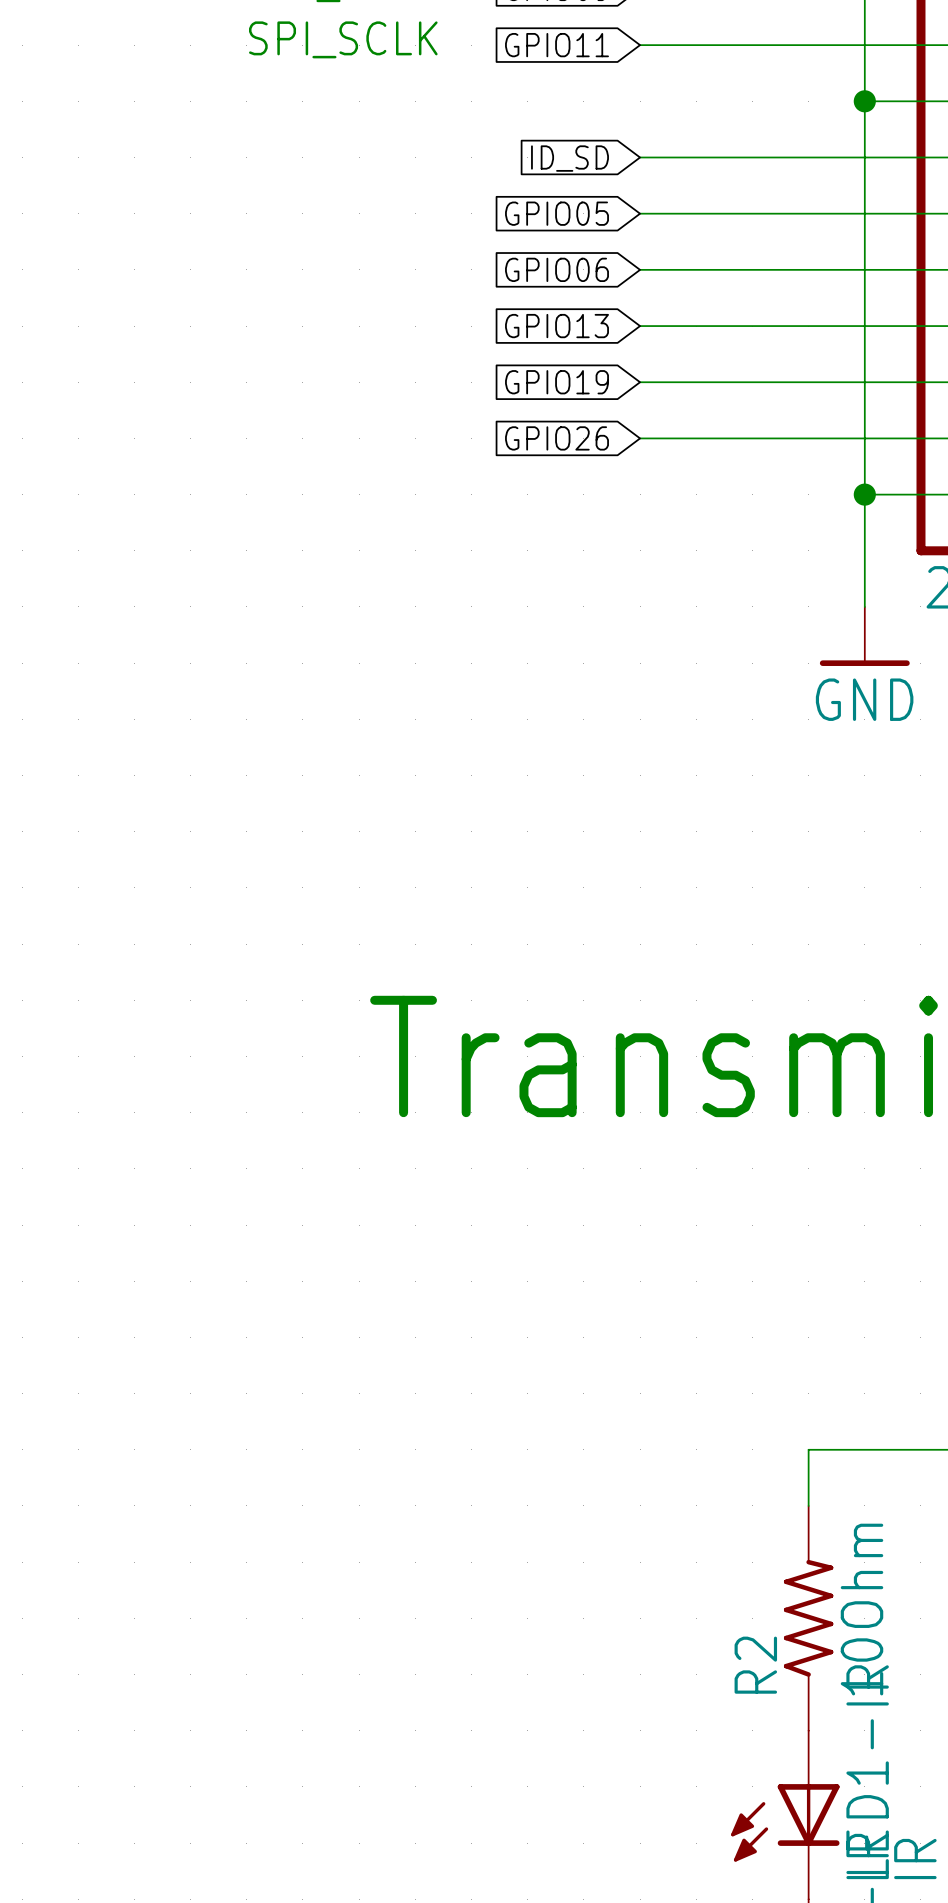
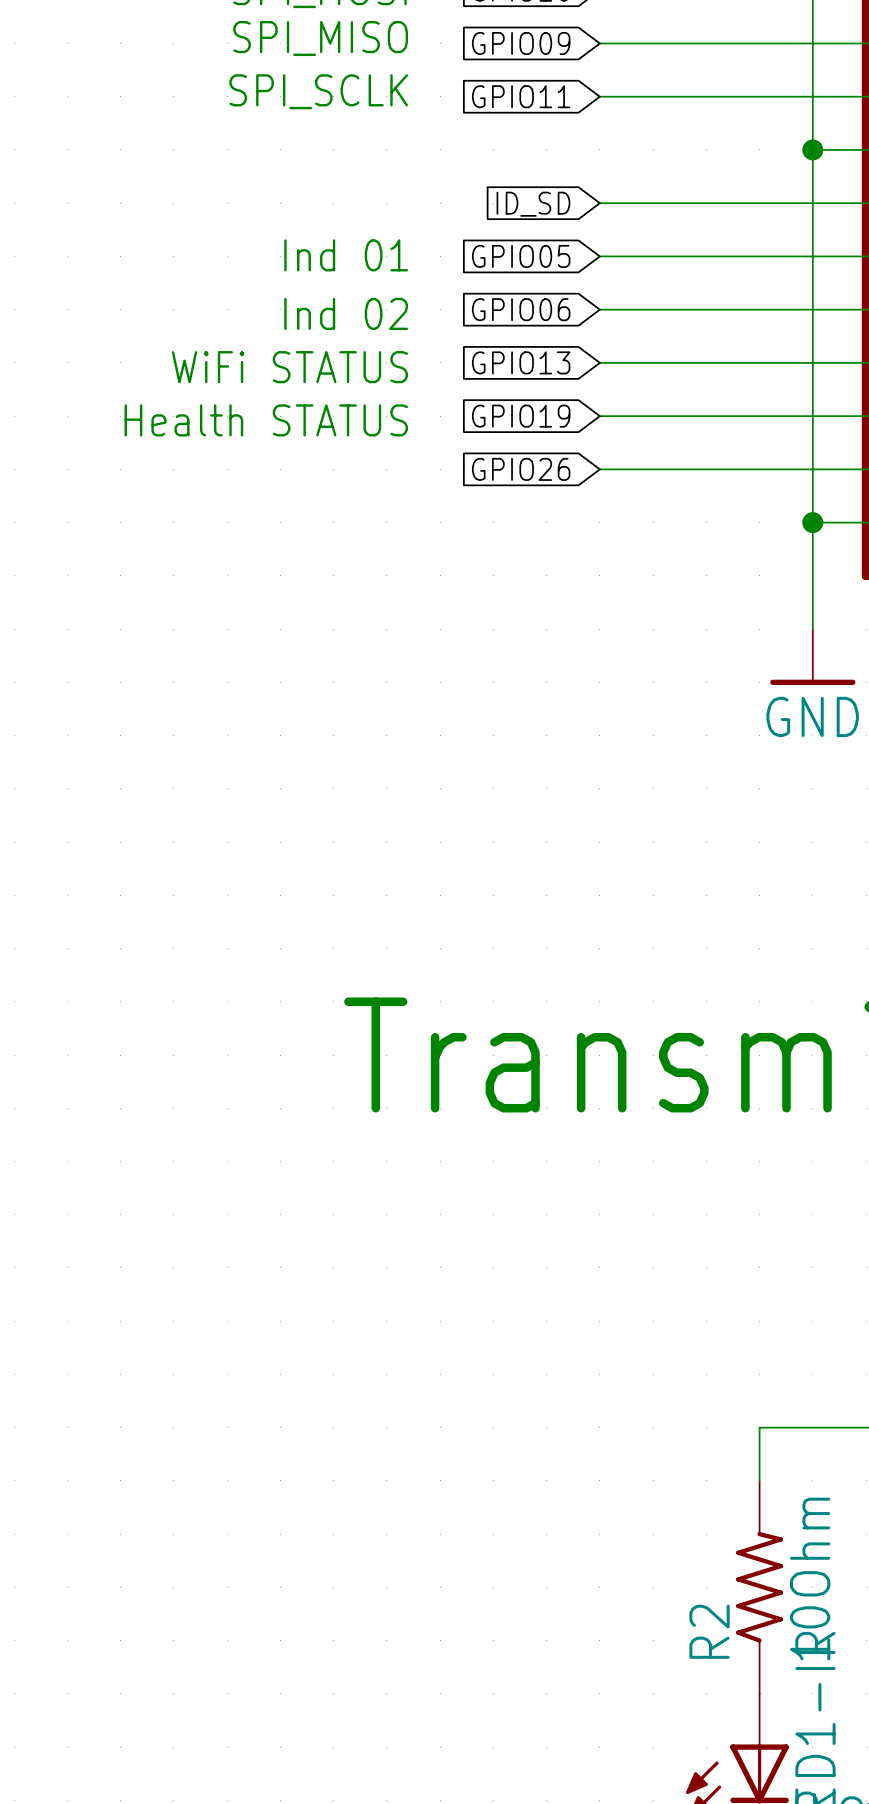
text: none -> Ind 01 (346, 255)
text: none -> Ind 02 (346, 313)
text: none -> WiFi STATUS (289, 367)
text: none -> Health STATUS (266, 420)

